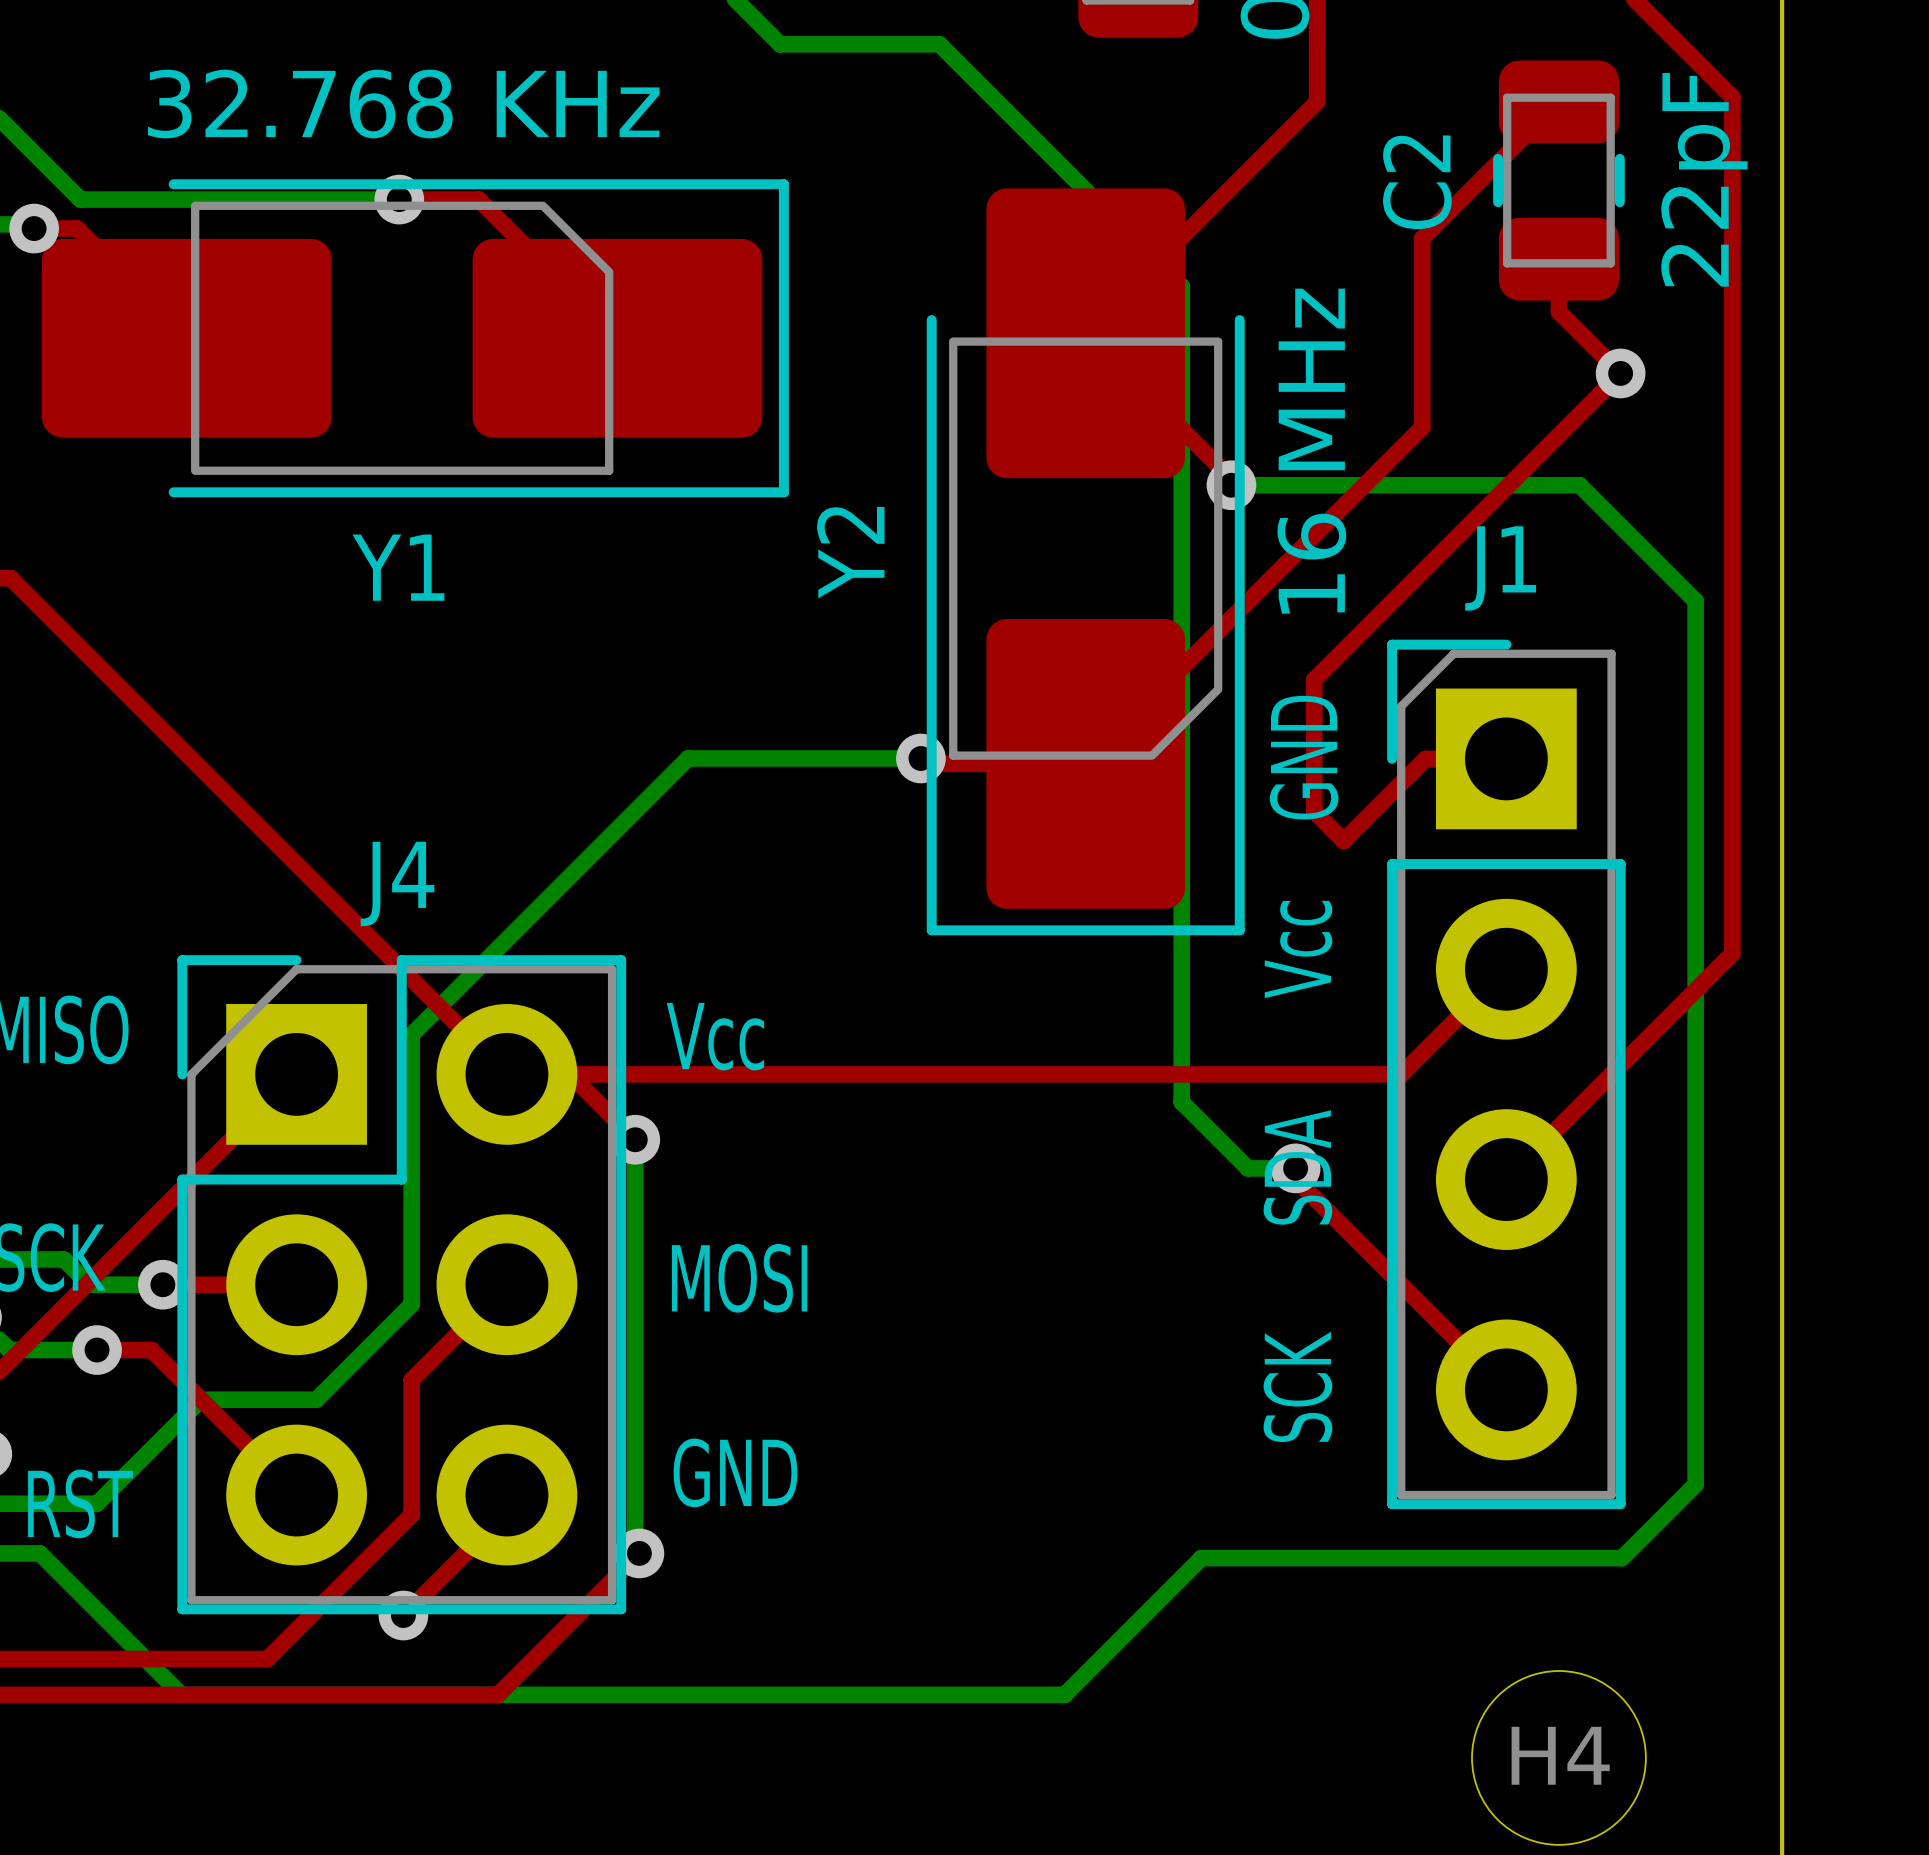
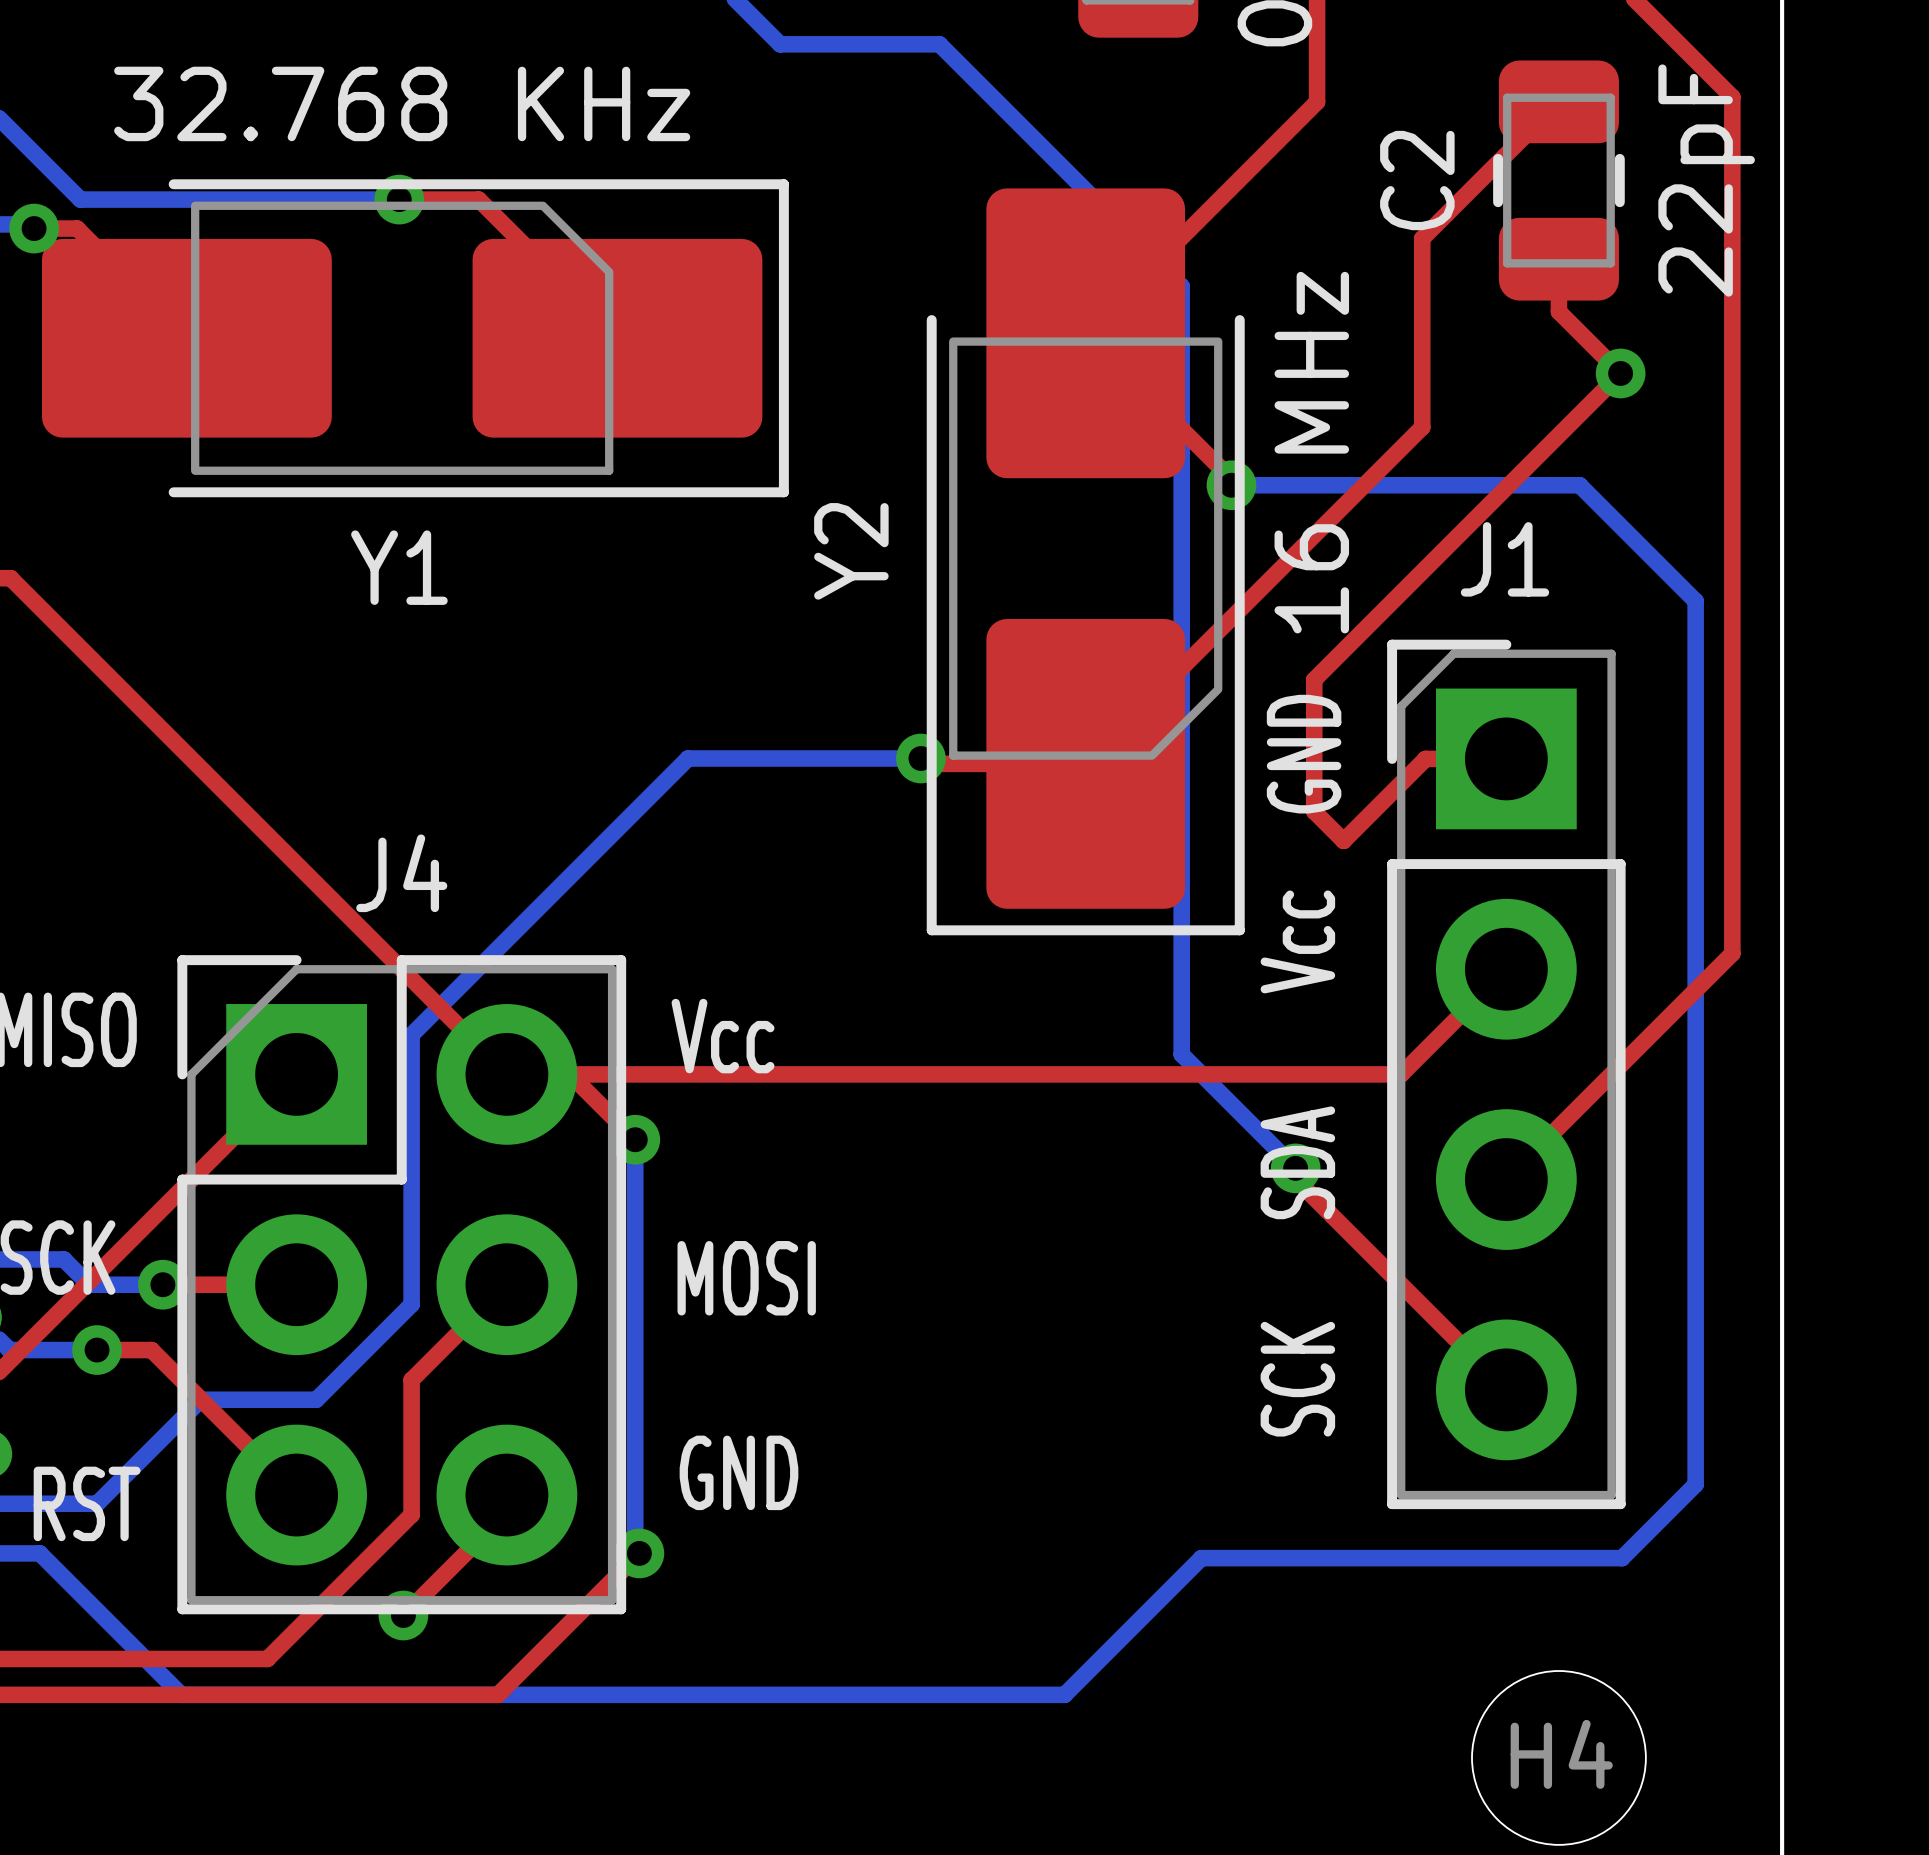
bottom track: (1181, 1054) (1181, 1102) (1248, 1168) (1295, 1168) -> (1181, 1054) (1295, 1168)

